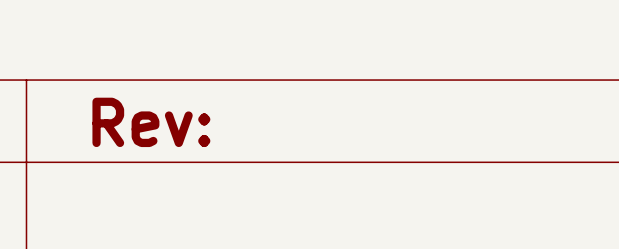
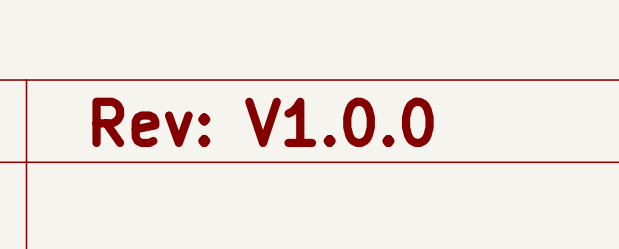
title block: Rev: (151, 122) -> Rev: V1.0.0 (263, 122)

